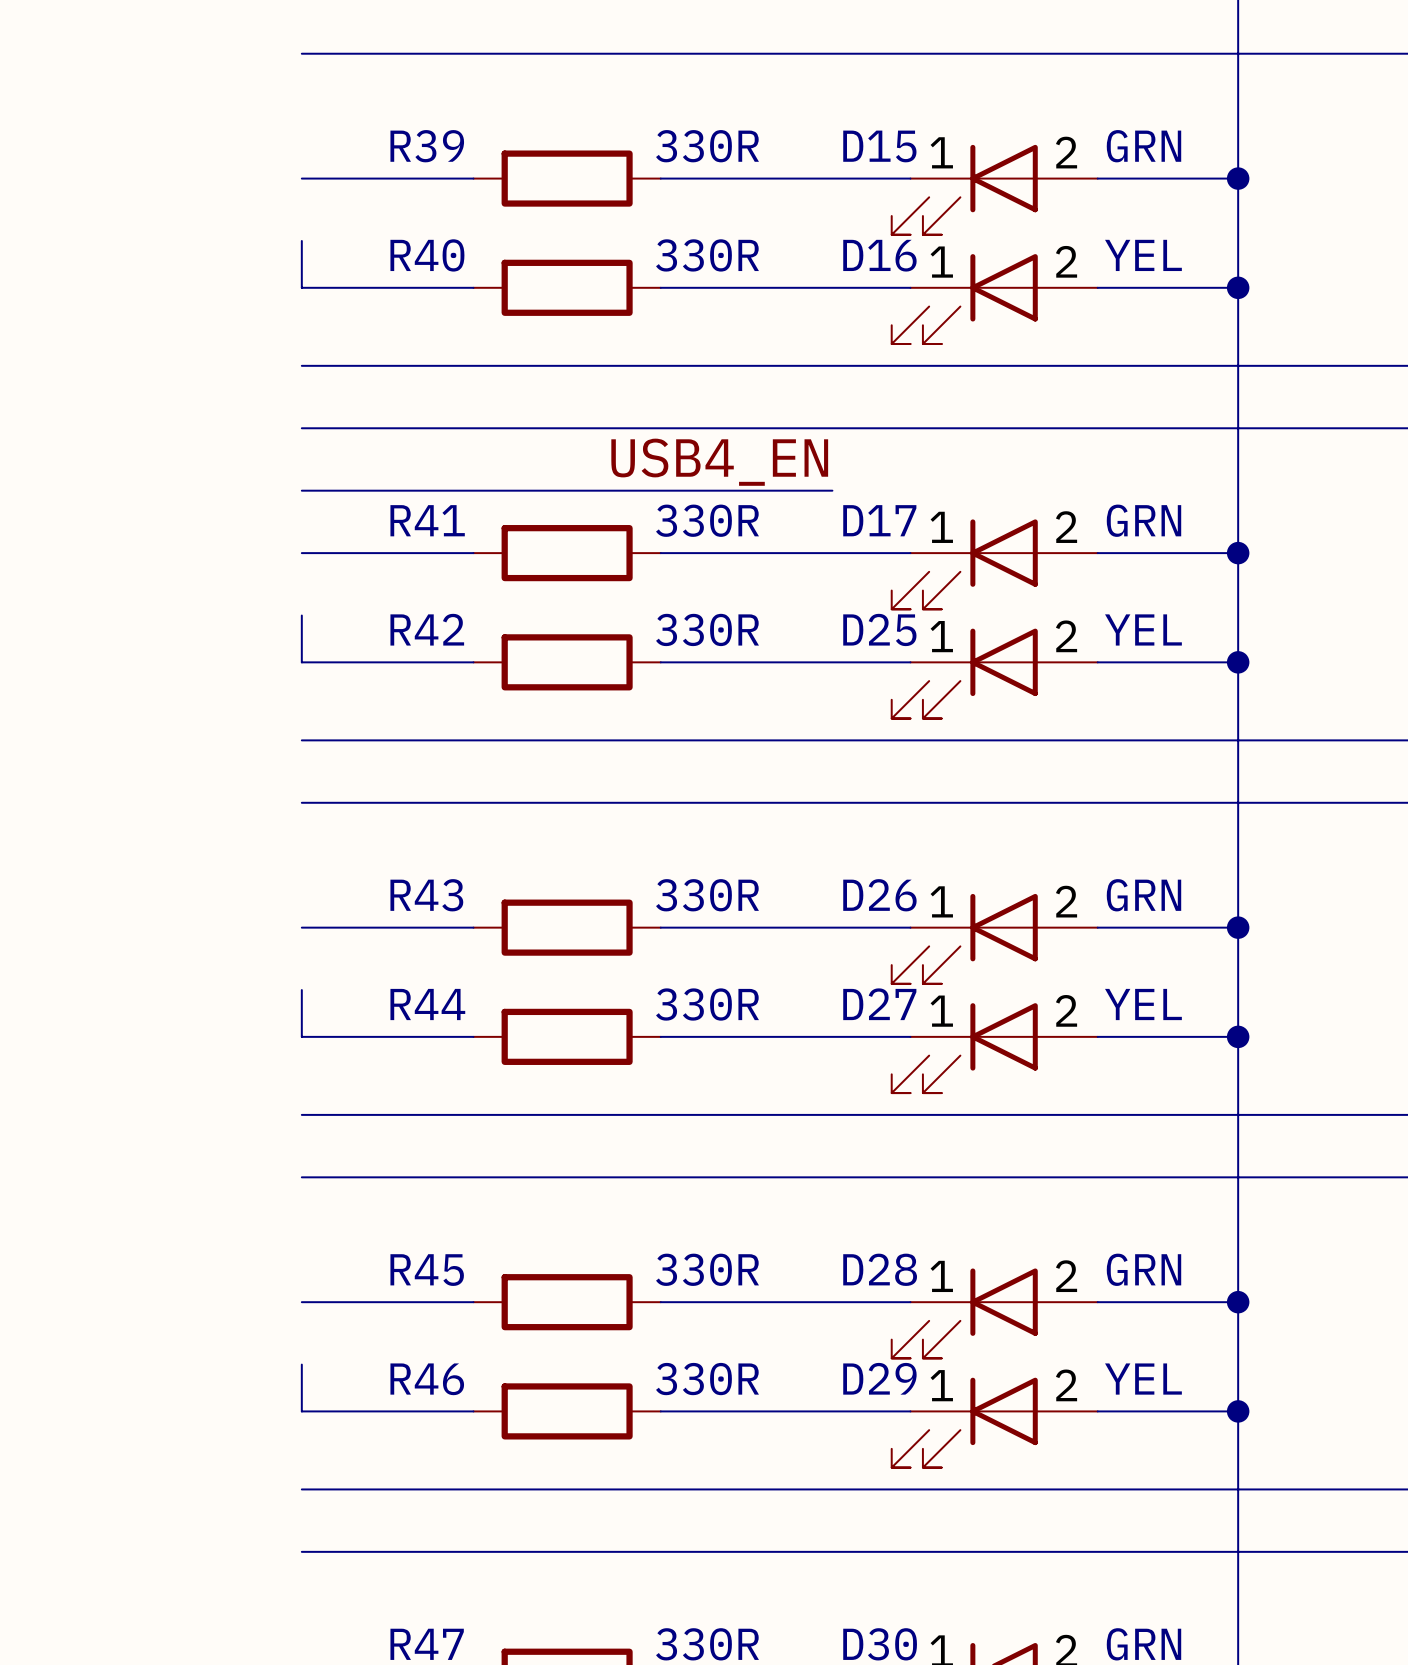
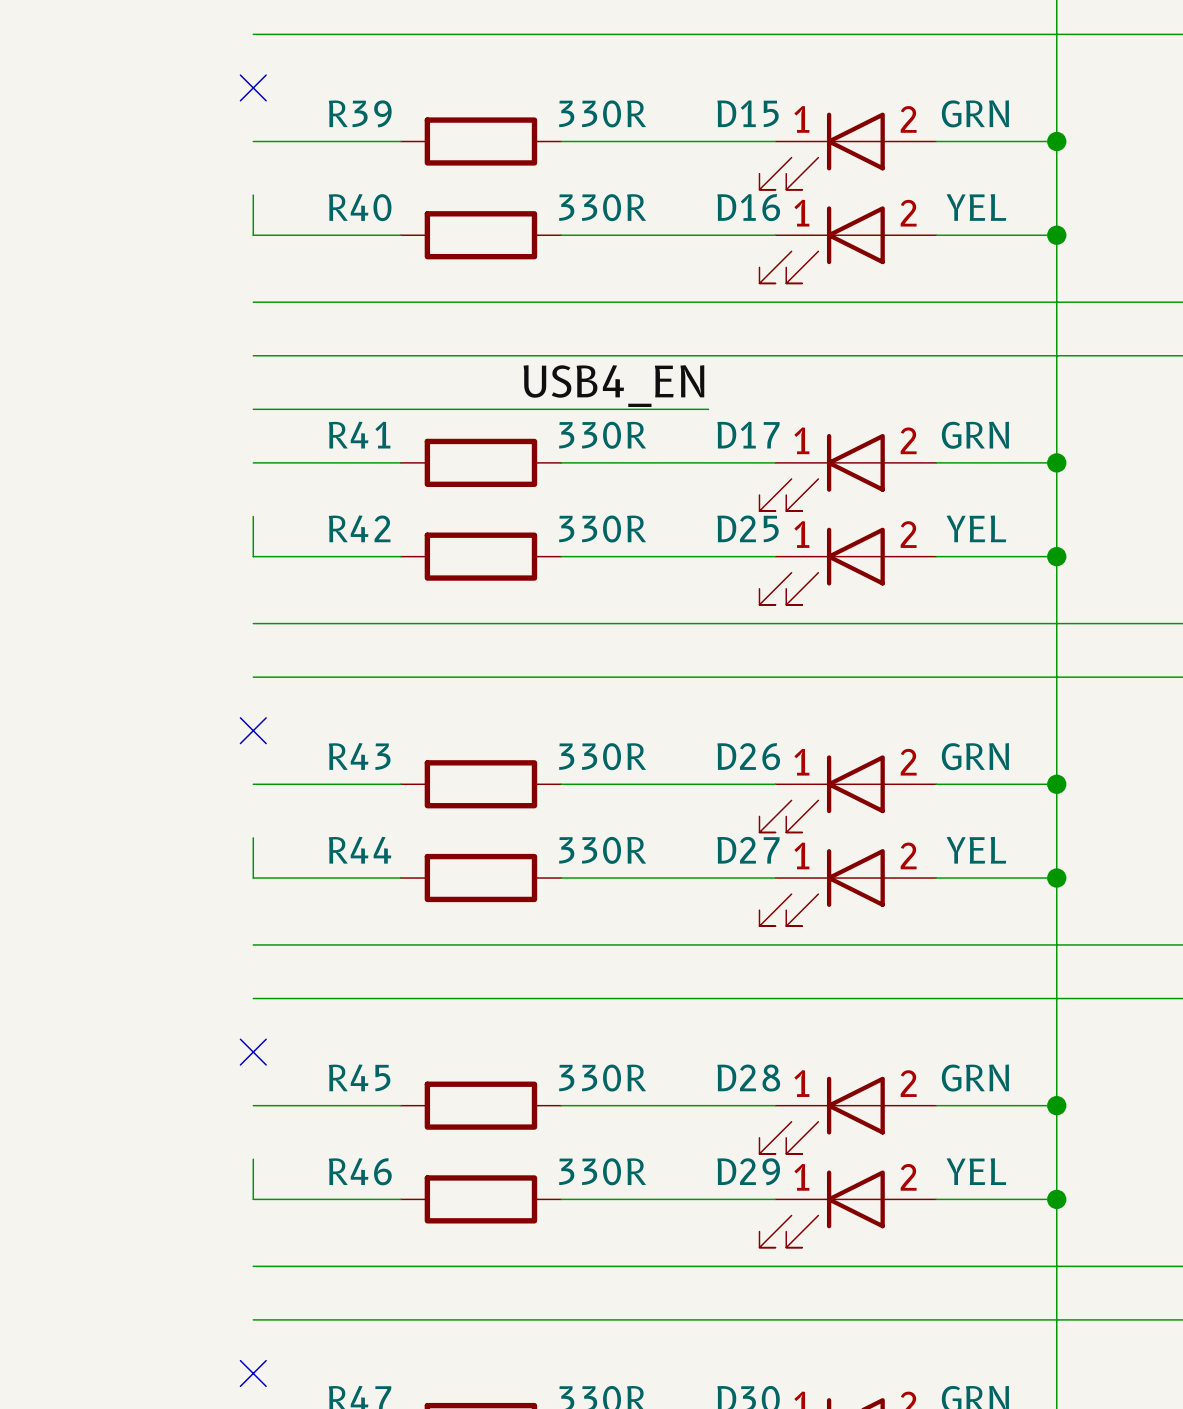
no-connect mark: none -> (253, 87)
no-connect mark: none -> (253, 730)
no-connect mark: none -> (253, 1052)
no-connect mark: none -> (253, 1373)

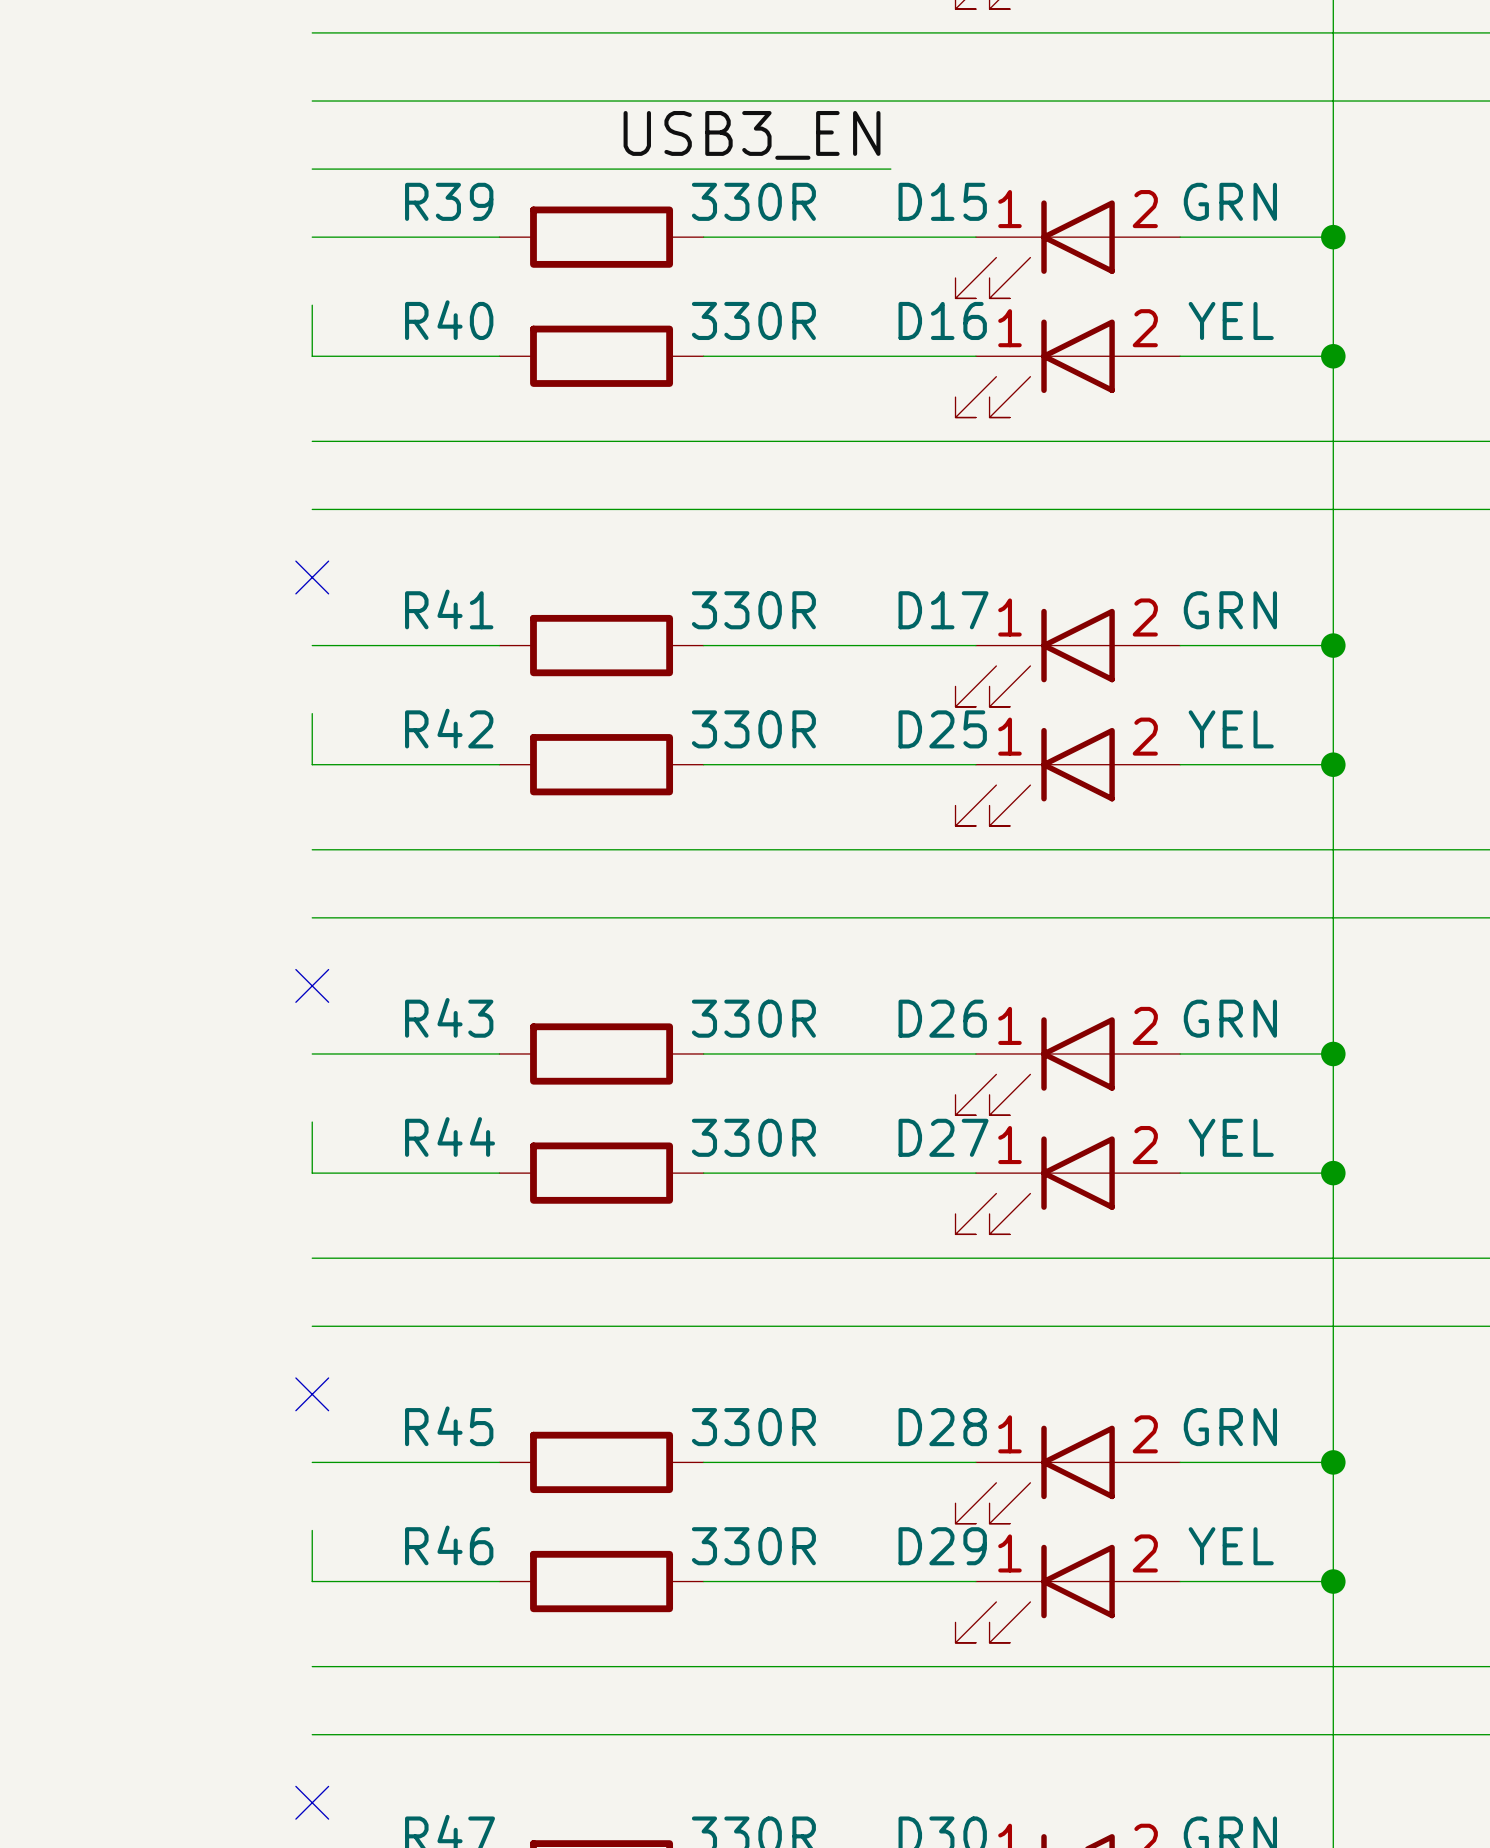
label: none -> USB3_EN (752, 135)
no-connect mark: (253, 87) -> none
label: USB4_EN (613, 386) -> none
wire: (253, 409) (708, 409) -> (312, 169) (890, 169)
no-connect mark: none -> (312, 577)

